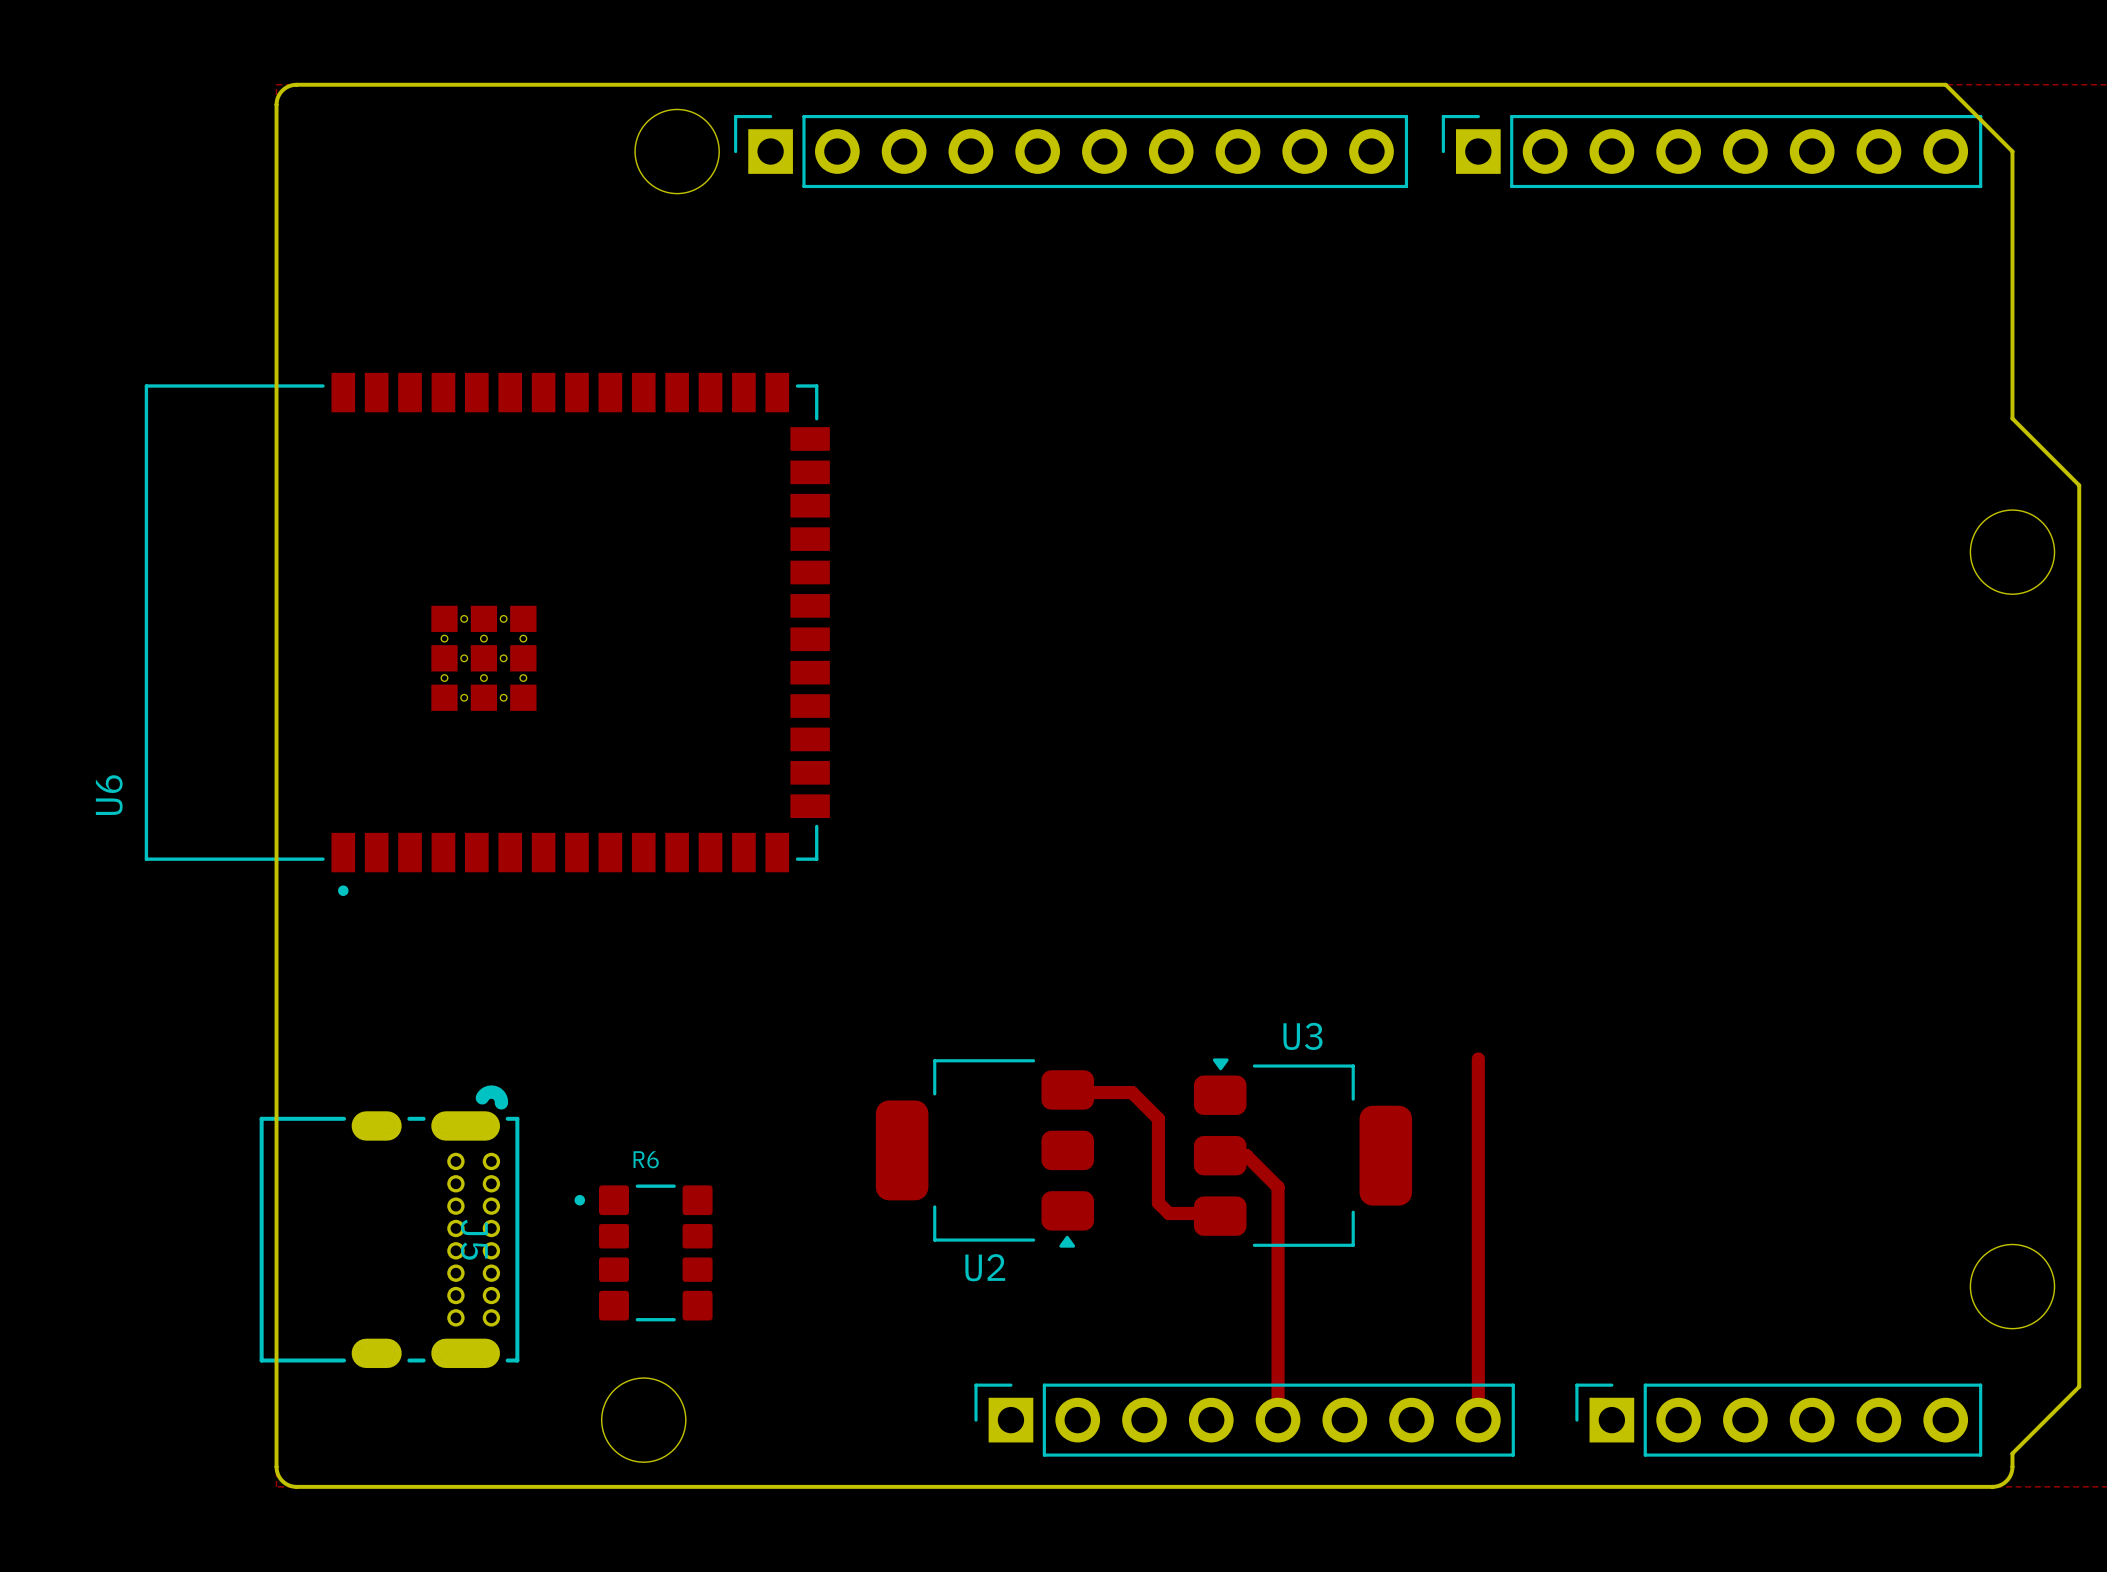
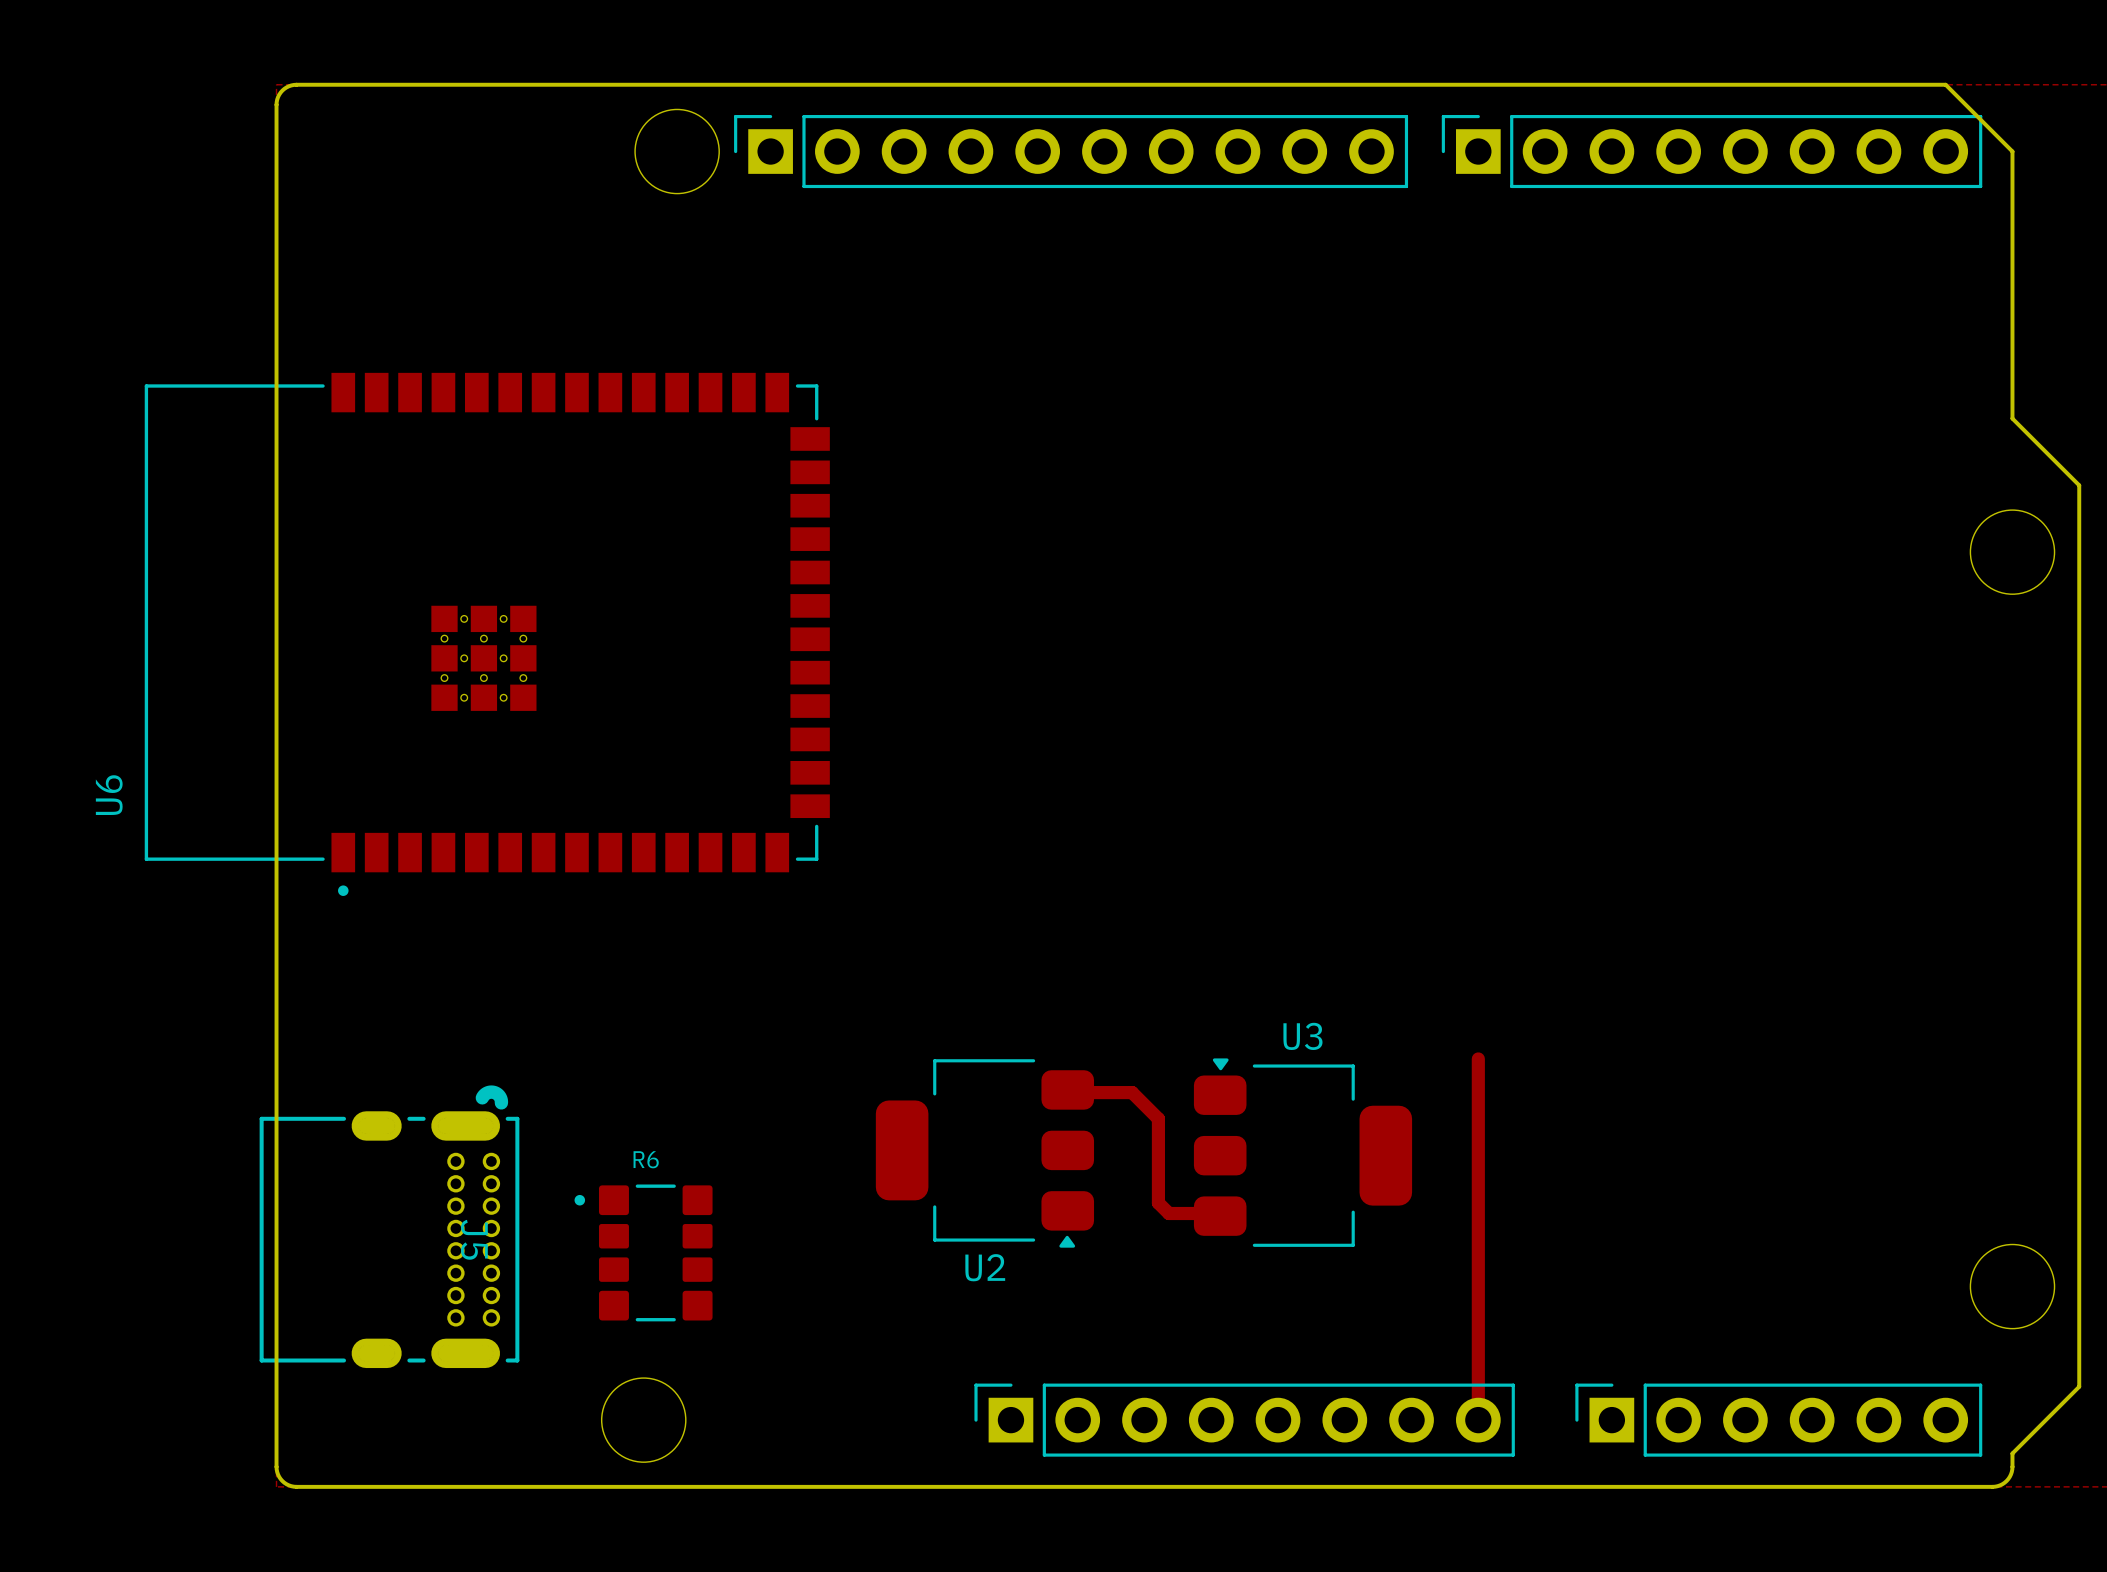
track: (1220, 1155) (1246, 1155) (1278, 1187) (1278, 1420) -> none

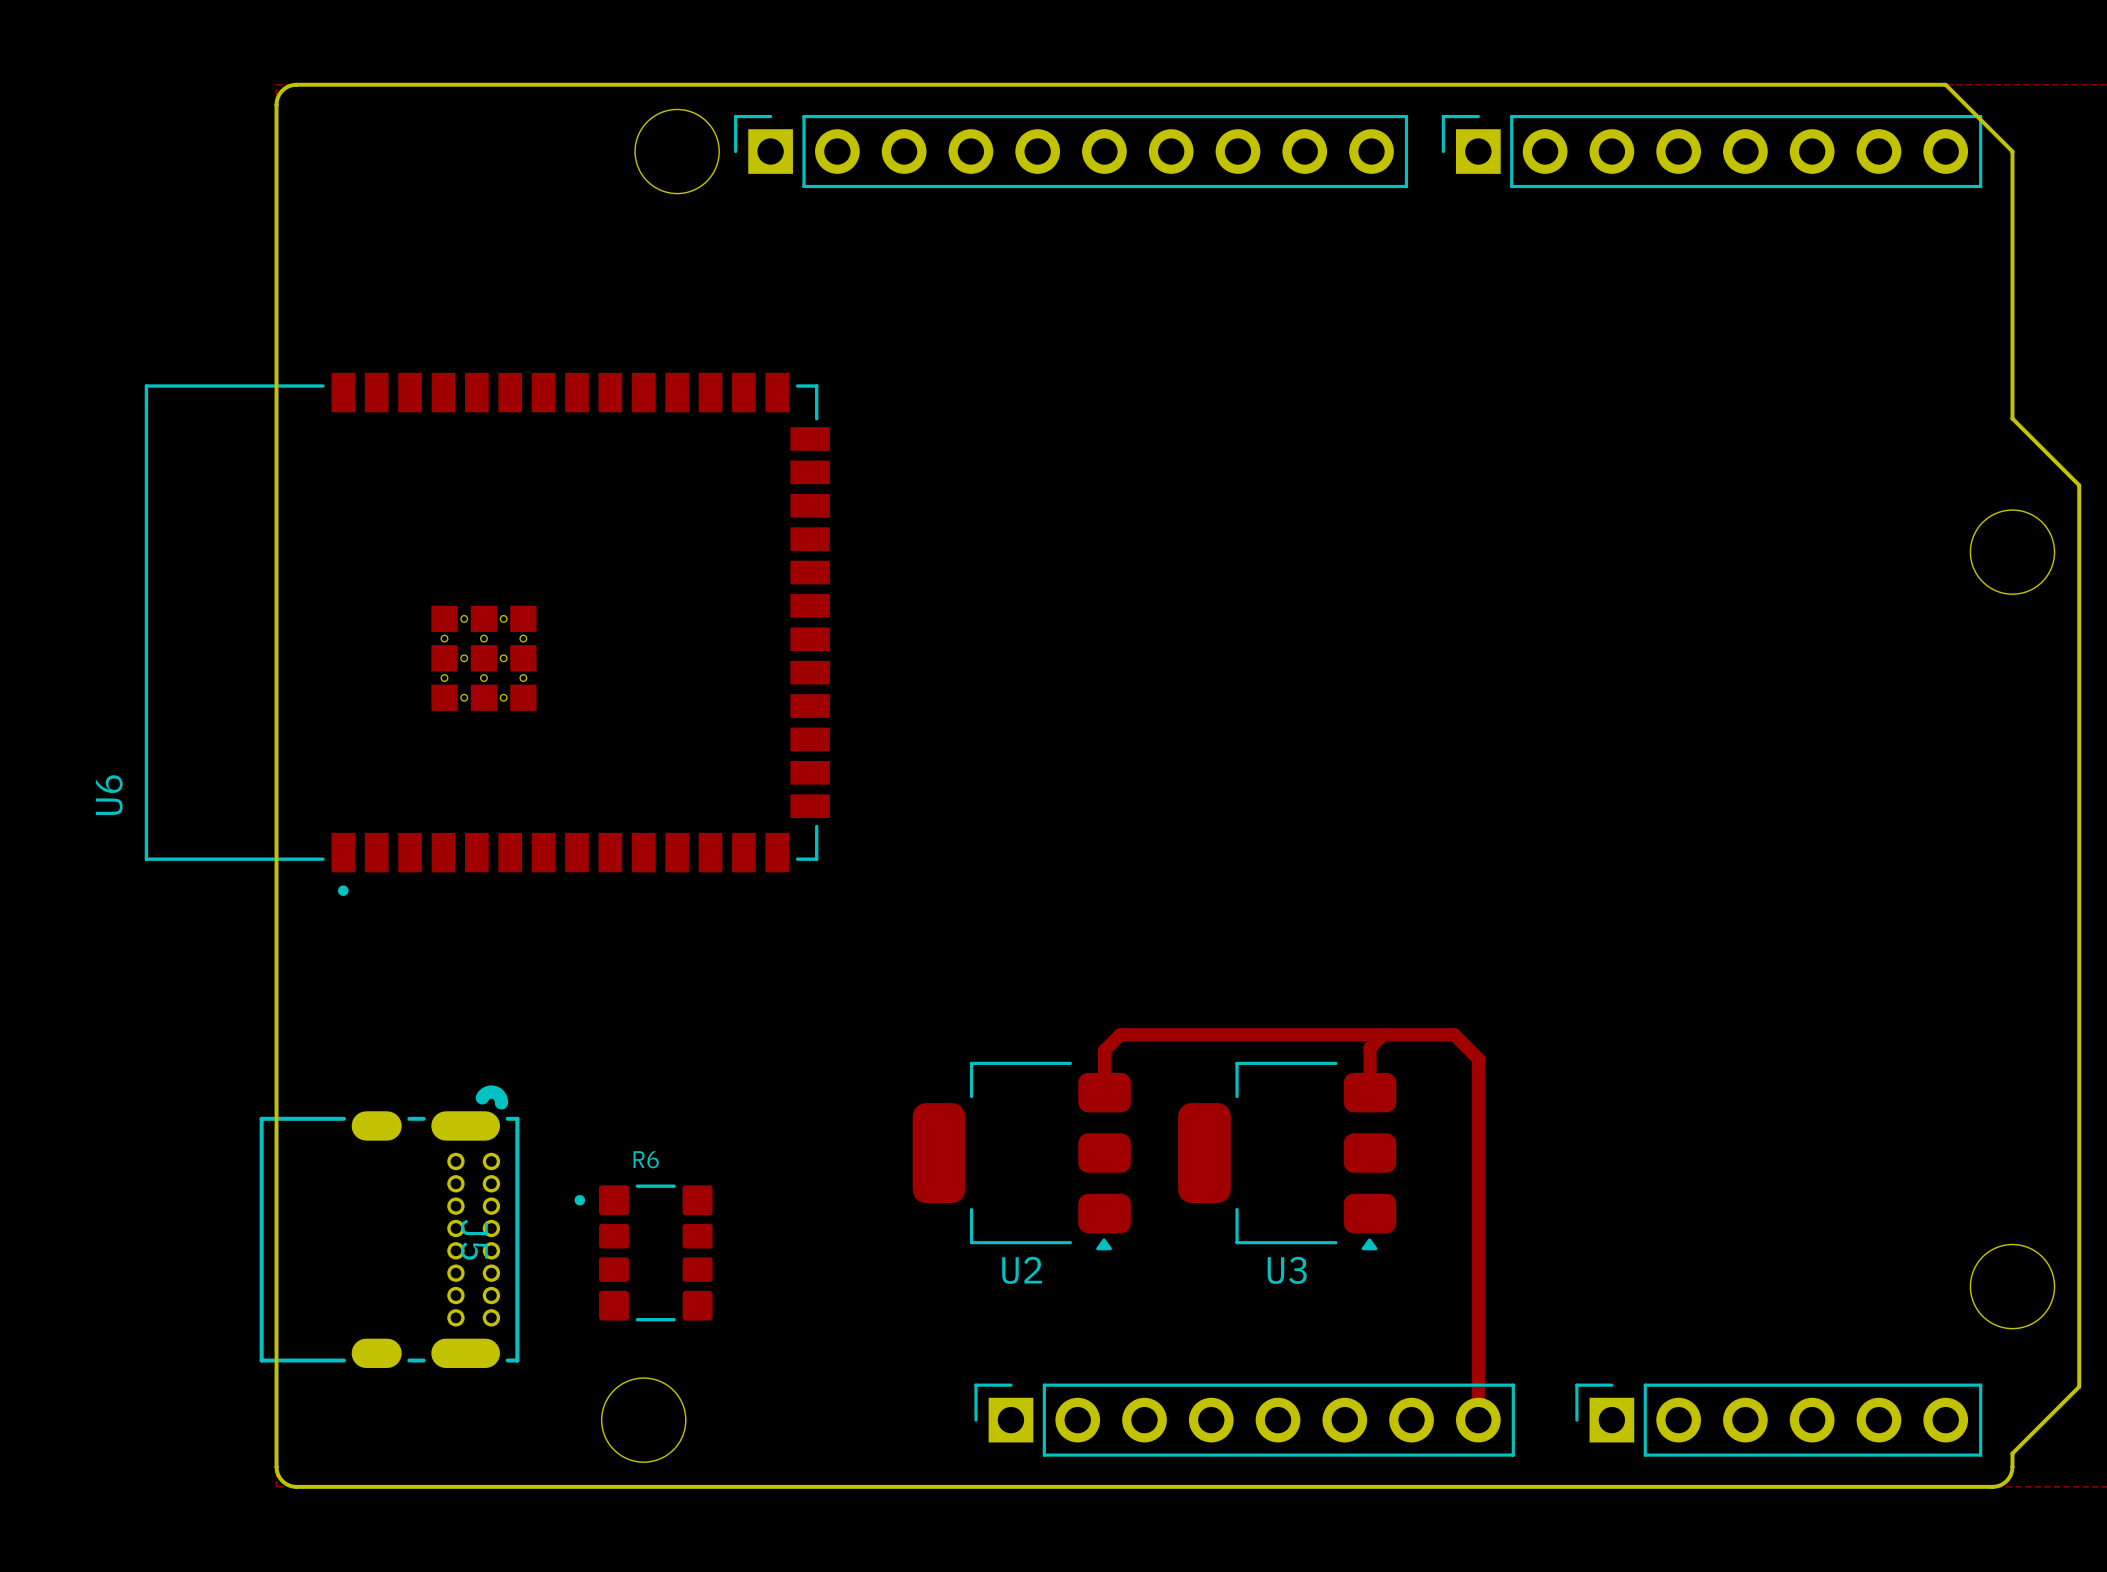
track: none -> (1383, 1034) (1370, 1047) (1370, 1092)
track: none -> (1478, 1058) (1454, 1034) (1120, 1034) (1104, 1050) (1104, 1092)
track: (1070, 1092) (1132, 1092) (1158, 1118) (1158, 1202) (1168, 1213) (1222, 1213) -> none
U3 rotation: 0° (1303, 1152) -> 180° (1287, 1156)
U2 position: (984, 1153) -> (1021, 1156)

